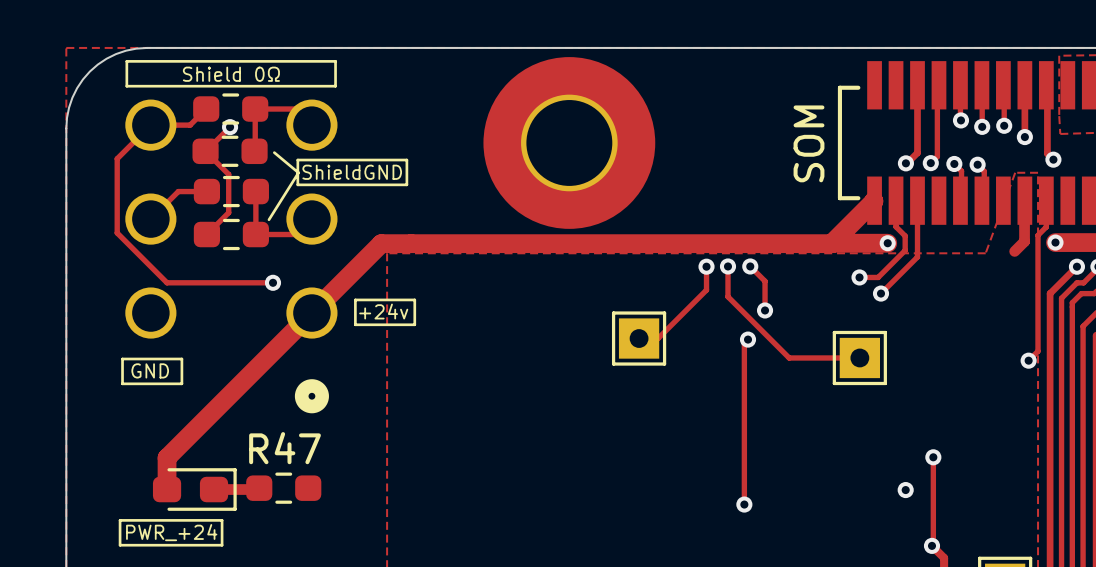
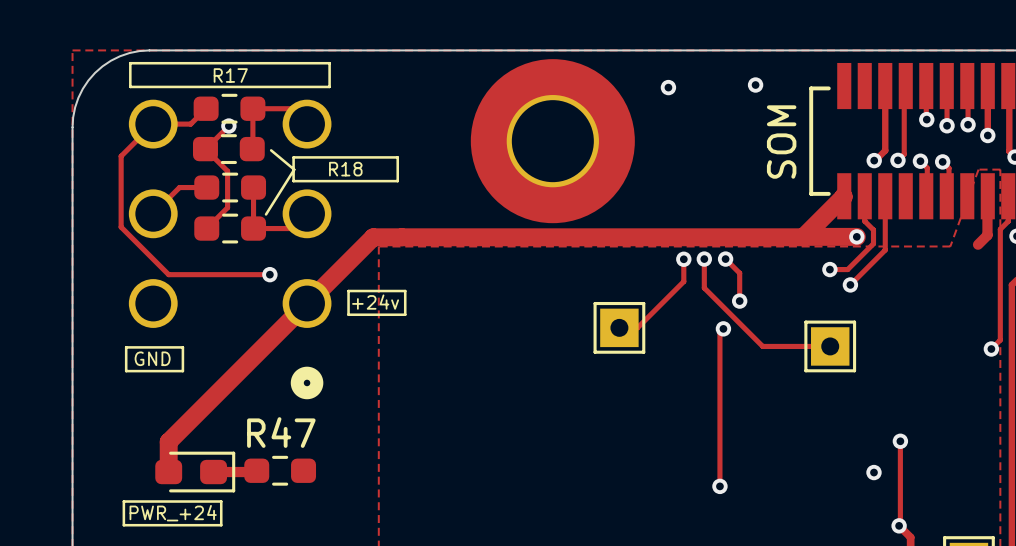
Shield 0Ω name: Shield 0Ω (231, 74) -> R17 (230, 75)
via: none -> (755, 85)
via: none -> (668, 87)
ShieldGND name: ShieldGND (352, 172) -> R18 (345, 169)

